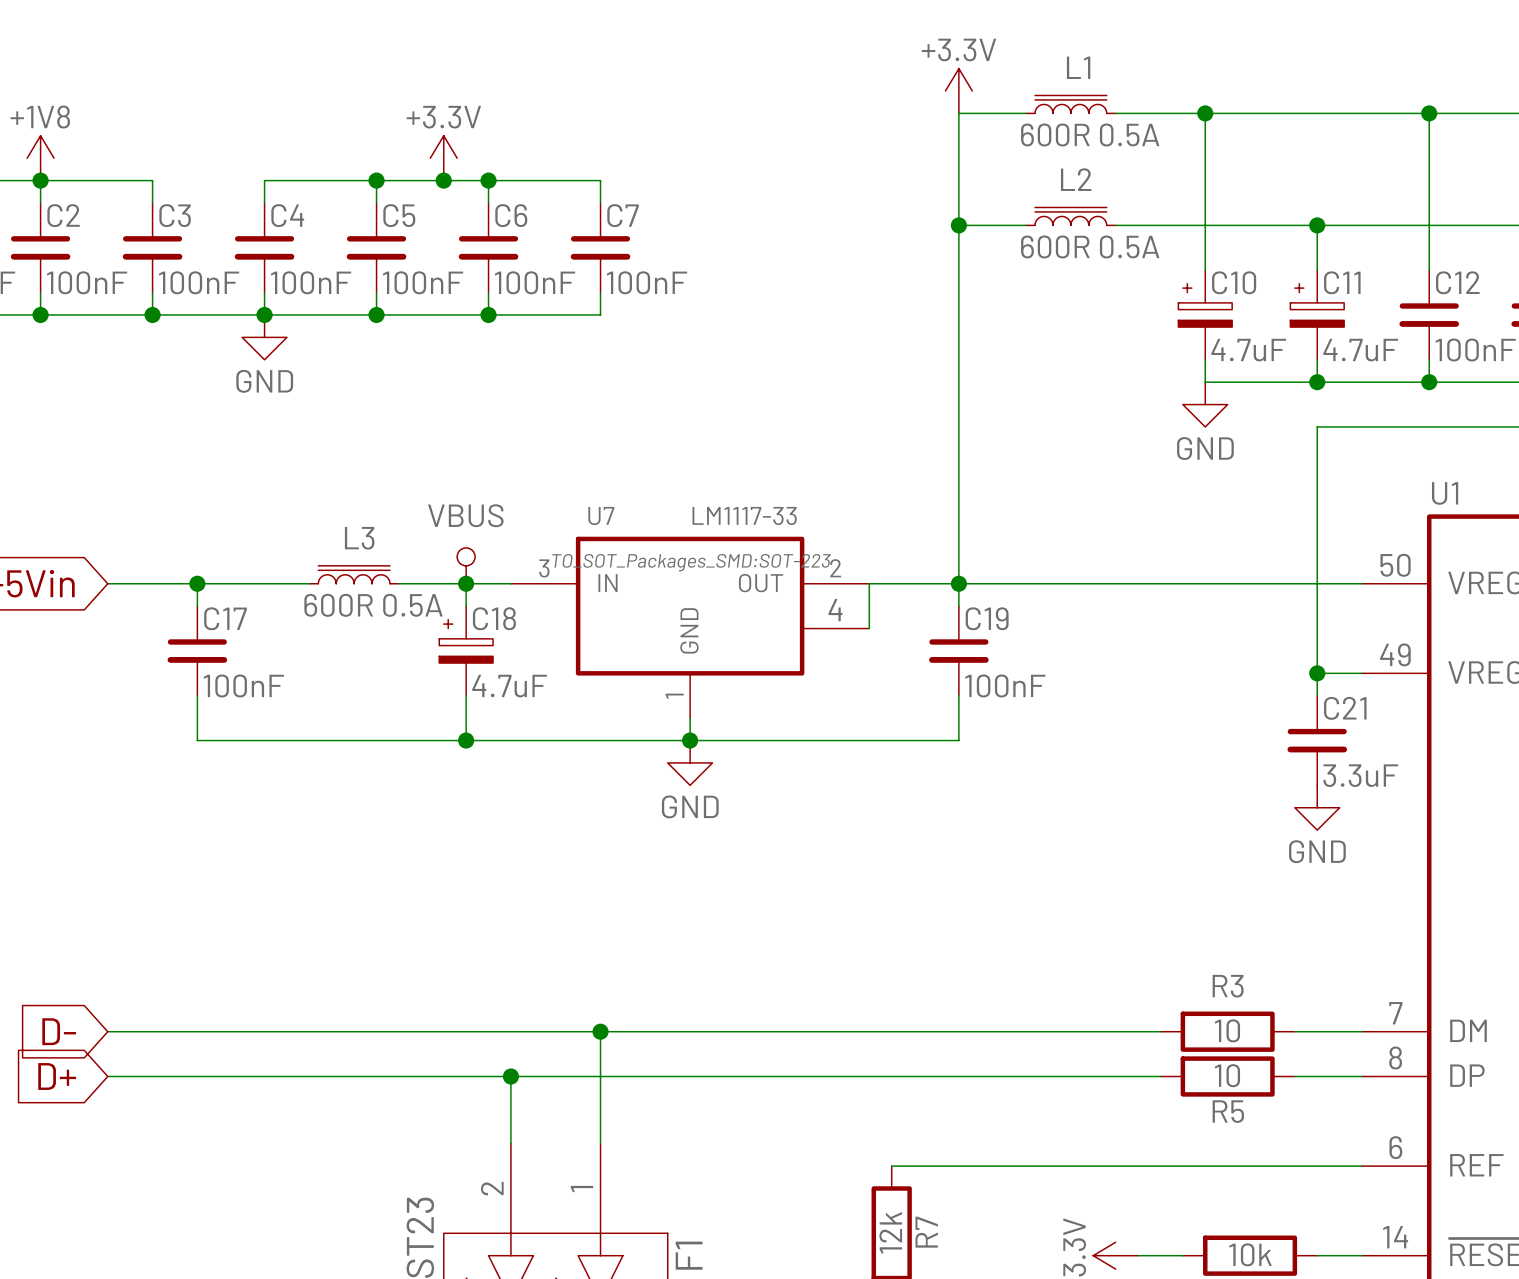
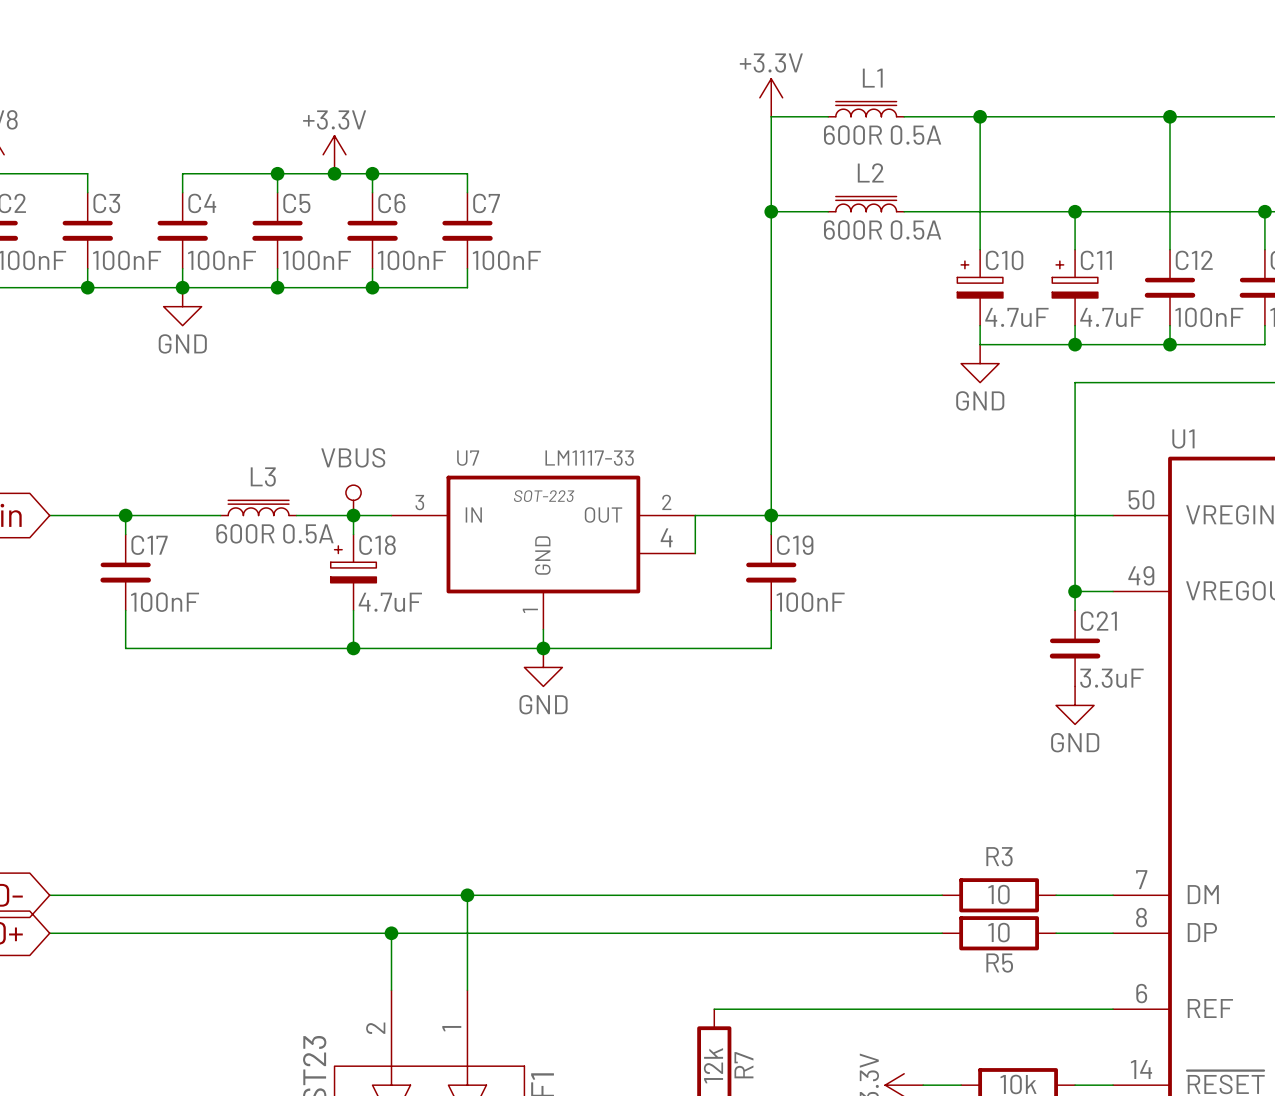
U7 text: TO_SOT_Packages_SMD:SOT-223 (691, 562) -> SOT-223 (544, 496)

